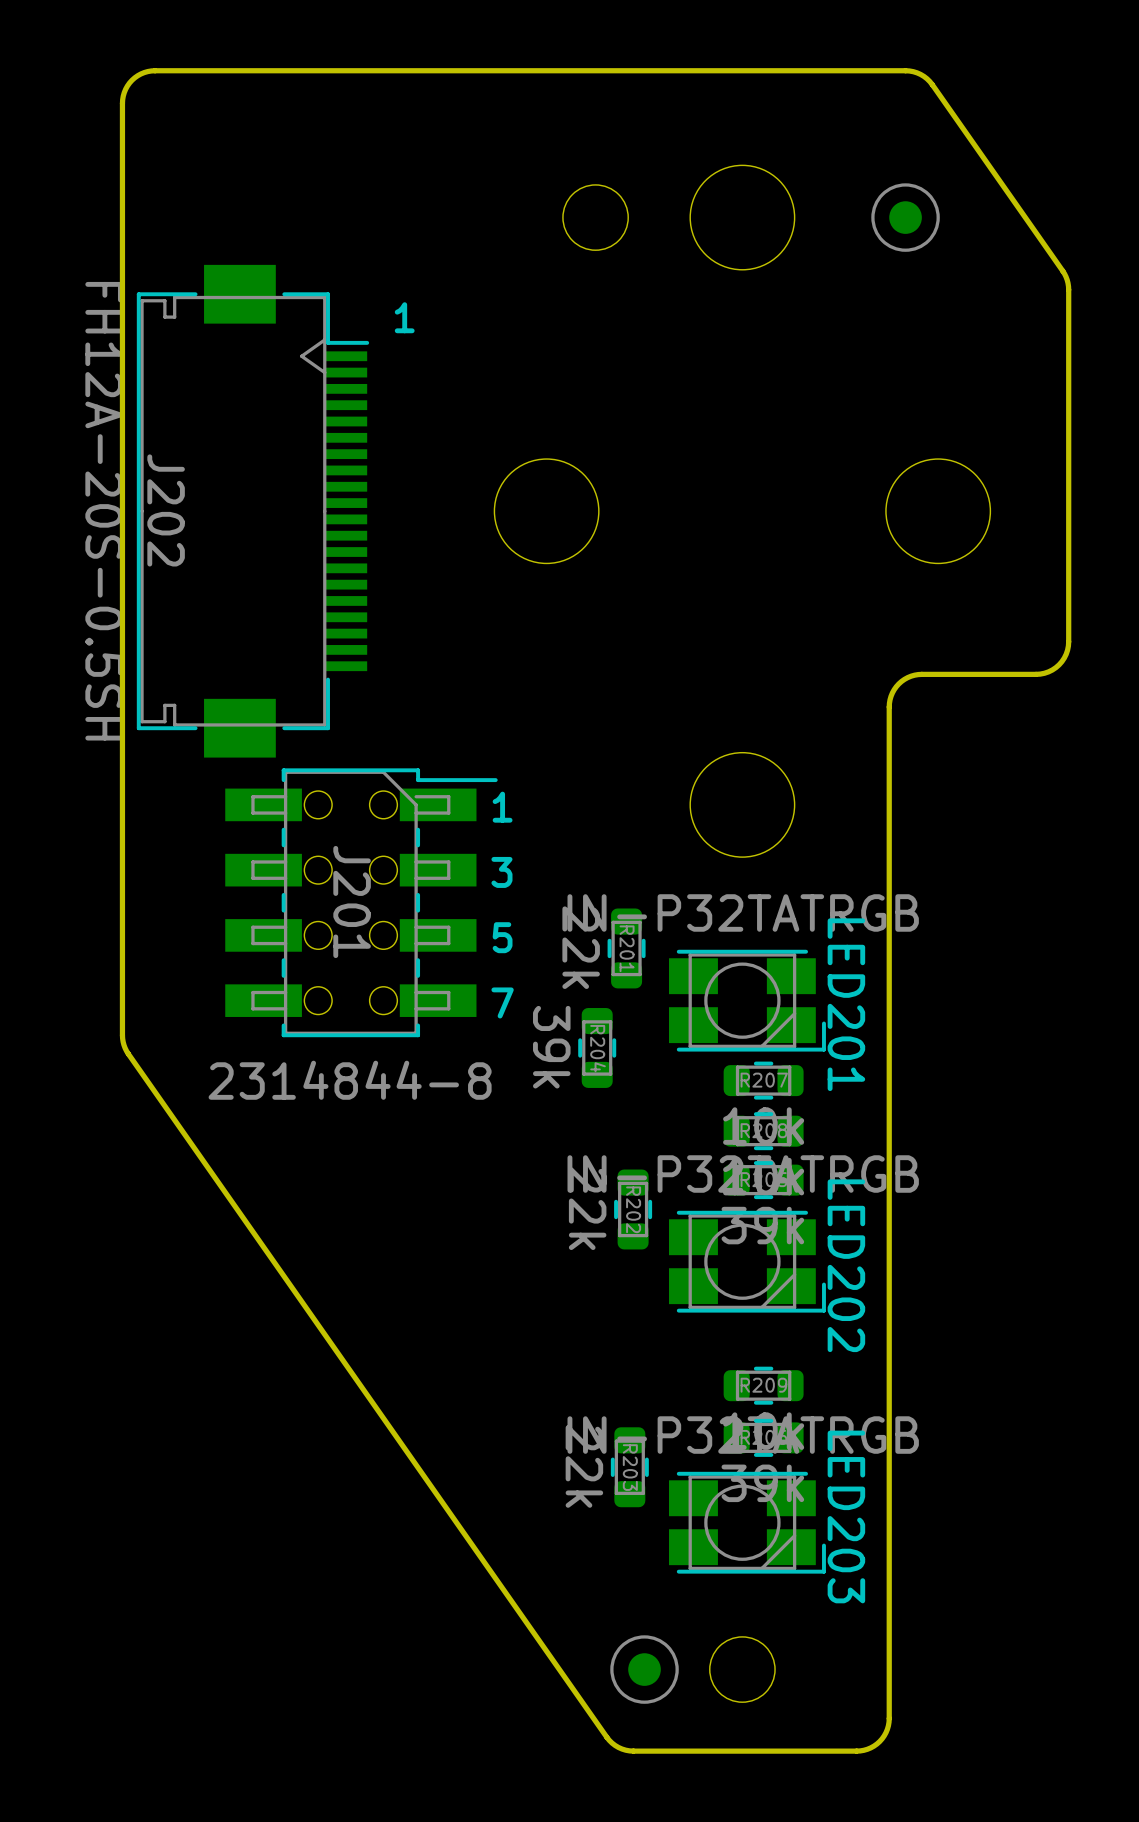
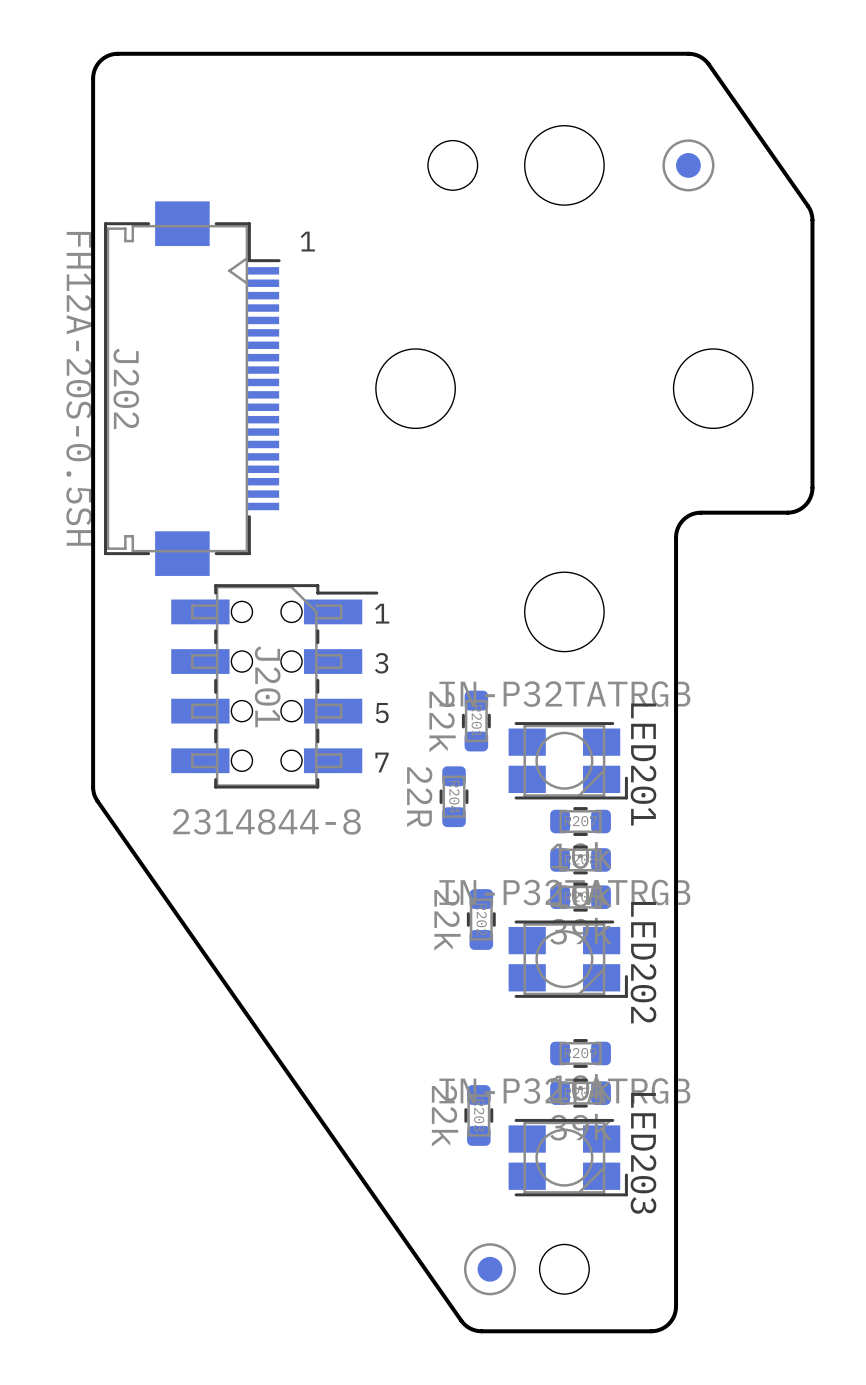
R204 value: 39k (551, 1047) -> 22R (419, 796)

